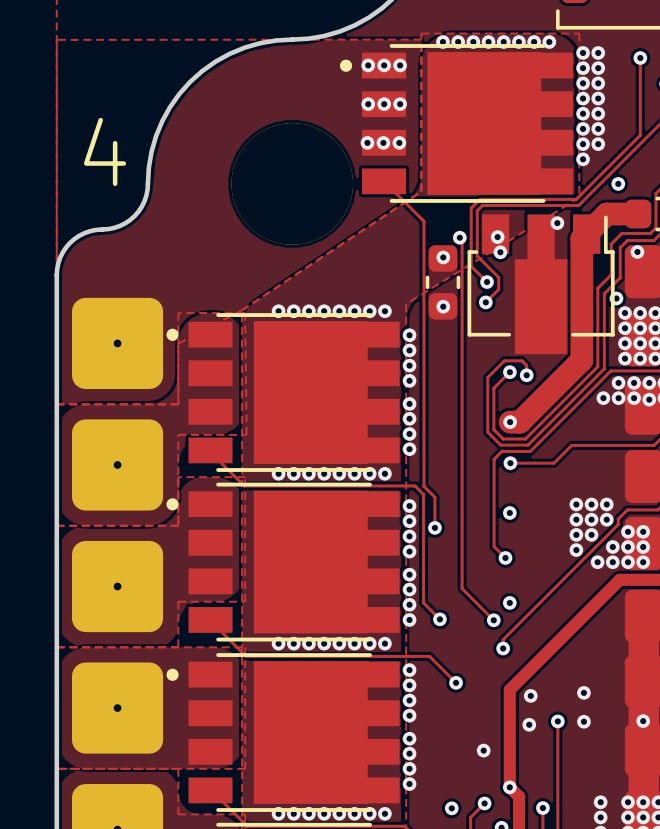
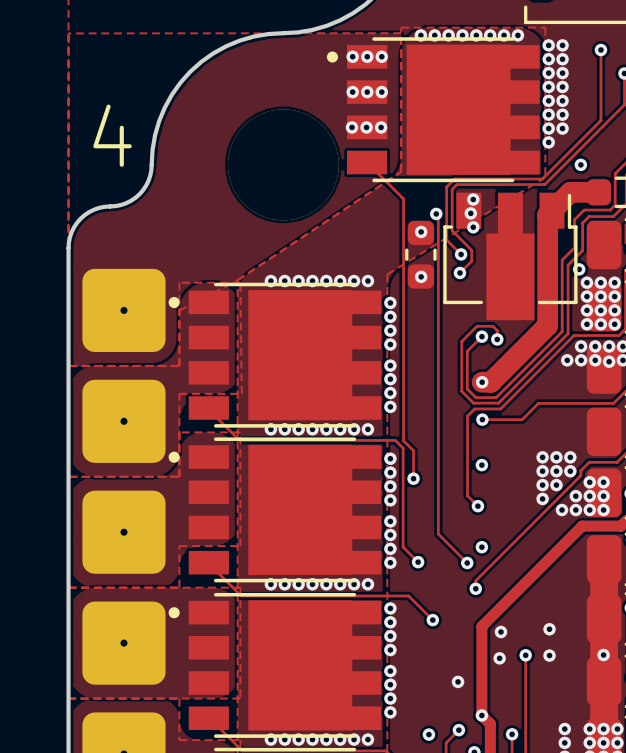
via position: (557, 223) -> (473, 199)
via: (637, 251) -> none

